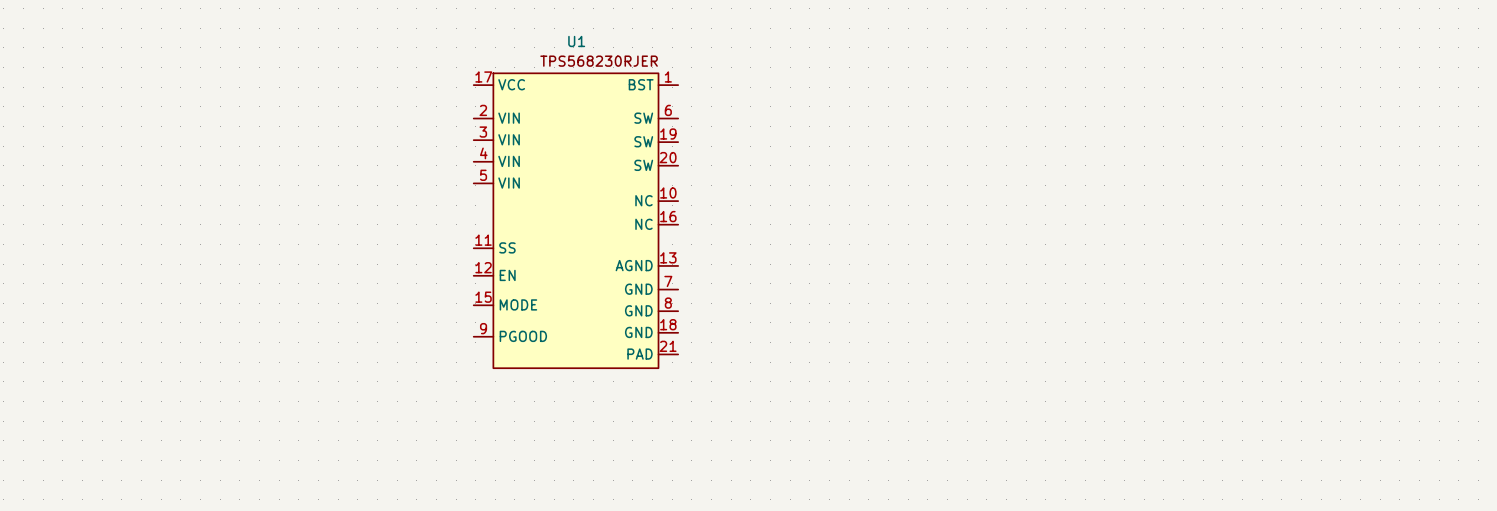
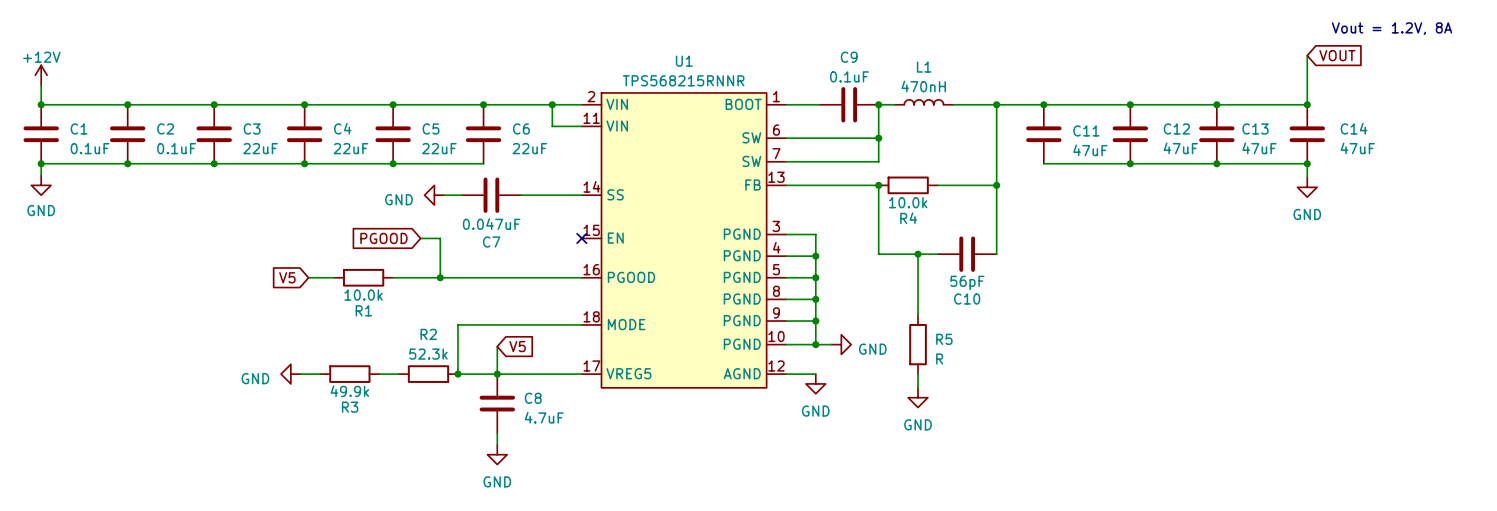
text: none -> Vout = 1.2V, 8A (1392, 28)
wire: none -> (1307, 55) (1307, 104) (953, 104)
global label: none -> VOUT (1337, 55)
U1 symbol: [473, 73, 679, 369] -> [581, 92, 787, 388]
power symbol: none -> +12V (41, 75)
U1 value: none -> TPS568215RNNR (683, 80)
wire: none -> (41, 85) (41, 104) (581, 104)
L1: none -> 470nH (923, 102)
junction: none -> (41, 104)
junction: none -> (127, 104)
junction: none -> (214, 104)
junction: none -> (304, 104)
junction: none -> (393, 104)
junction: none -> (483, 104)
junction: none -> (552, 104)
wire: none -> (786, 104) (819, 104)
C9: none -> 0.1uF (849, 104)
junction: none -> (878, 104)
wire: none -> (894, 104) (878, 104) (878, 161) (786, 161)
wire: none -> (996, 104) (996, 254)
junction: none -> (996, 104)
junction: none -> (1043, 104)
junction: none -> (1130, 104)
junction: none -> (1216, 104)
junction: none -> (1307, 104)
C1: none -> 0.1uF (41, 134)
C2: none -> 0.1uF (127, 134)
C3: none -> 22uF (214, 134)
C4: none -> 22uF (304, 134)
C5: none -> 22uF (393, 134)
C6: none -> 22uF (483, 134)
C11: none -> 47uF (1043, 134)
C12: none -> 47uF (1130, 134)
C13: none -> 47uF (1216, 134)
C14: none -> 47uF (1307, 134)
wire: none -> (786, 138) (878, 138)
junction: none -> (878, 138)
junction: none -> (41, 163)
junction: none -> (127, 163)
junction: none -> (214, 163)
junction: none -> (304, 163)
junction: none -> (393, 163)
wire: none -> (483, 163) (41, 163) (41, 175)
wire: none -> (1043, 163) (1307, 163) (1307, 177)
junction: none -> (1130, 163)
junction: none -> (1216, 163)
junction: none -> (1307, 163)
power symbol: none -> GND (41, 185)
wire: none -> (786, 185) (878, 185) (878, 254) (937, 254)
junction: none -> (878, 185)
R4: none -> 10.0k (908, 185)
wire: none -> (937, 185) (996, 185)
junction: none -> (996, 185)
power symbol: none -> GND (1307, 187)
power symbol: none -> GND (434, 195)
wire: none -> (444, 195) (461, 195)
C7: none -> 0.047uF (491, 195)
wire: none -> (786, 234) (815, 234) (815, 344)
global label: none -> PGOOD (383, 238)
wire: none -> (420, 238) (440, 238) (440, 277)
no-connect mark: none -> (581, 238)
wire: none -> (918, 254) (918, 315)
junction: none -> (918, 254)
C10: none -> 56pF (967, 254)
wire: none -> (786, 256) (815, 256)
junction: none -> (815, 256)
global label: none -> V5 (287, 277)
wire: none -> (308, 277) (334, 277)
R1: none -> 10.0k (363, 277)
wire: none -> (393, 277) (581, 277)
junction: none -> (440, 277)
wire: none -> (786, 277) (815, 277)
junction: none -> (815, 277)
wire: none -> (786, 299) (815, 299)
junction: none -> (815, 299)
wire: none -> (786, 321) (815, 321)
junction: none -> (815, 321)
wire: none -> (581, 324) (457, 324) (457, 374) (581, 374)
wire: none -> (786, 344) (831, 344)
junction: none -> (815, 344)
power symbol: none -> GND (841, 344)
R5: none -> R (918, 344)
global label: none -> V5 (517, 346)
power symbol: none -> GND (290, 374)
wire: none -> (300, 374) (320, 374)
R3: none -> 49.9k (349, 374)
wire: none -> (379, 374) (399, 374)
R2: none -> 52.3k (428, 374)
junction: none -> (457, 374)
junction: none -> (497, 374)
wire: none -> (786, 374) (815, 374)
wire: none -> (918, 374) (918, 387)
power symbol: none -> GND (815, 383)
power symbol: none -> GND (918, 397)
C8: none -> 4.7uF (497, 403)
wire: none -> (497, 433) (497, 444)
power symbol: none -> GND (497, 454)

